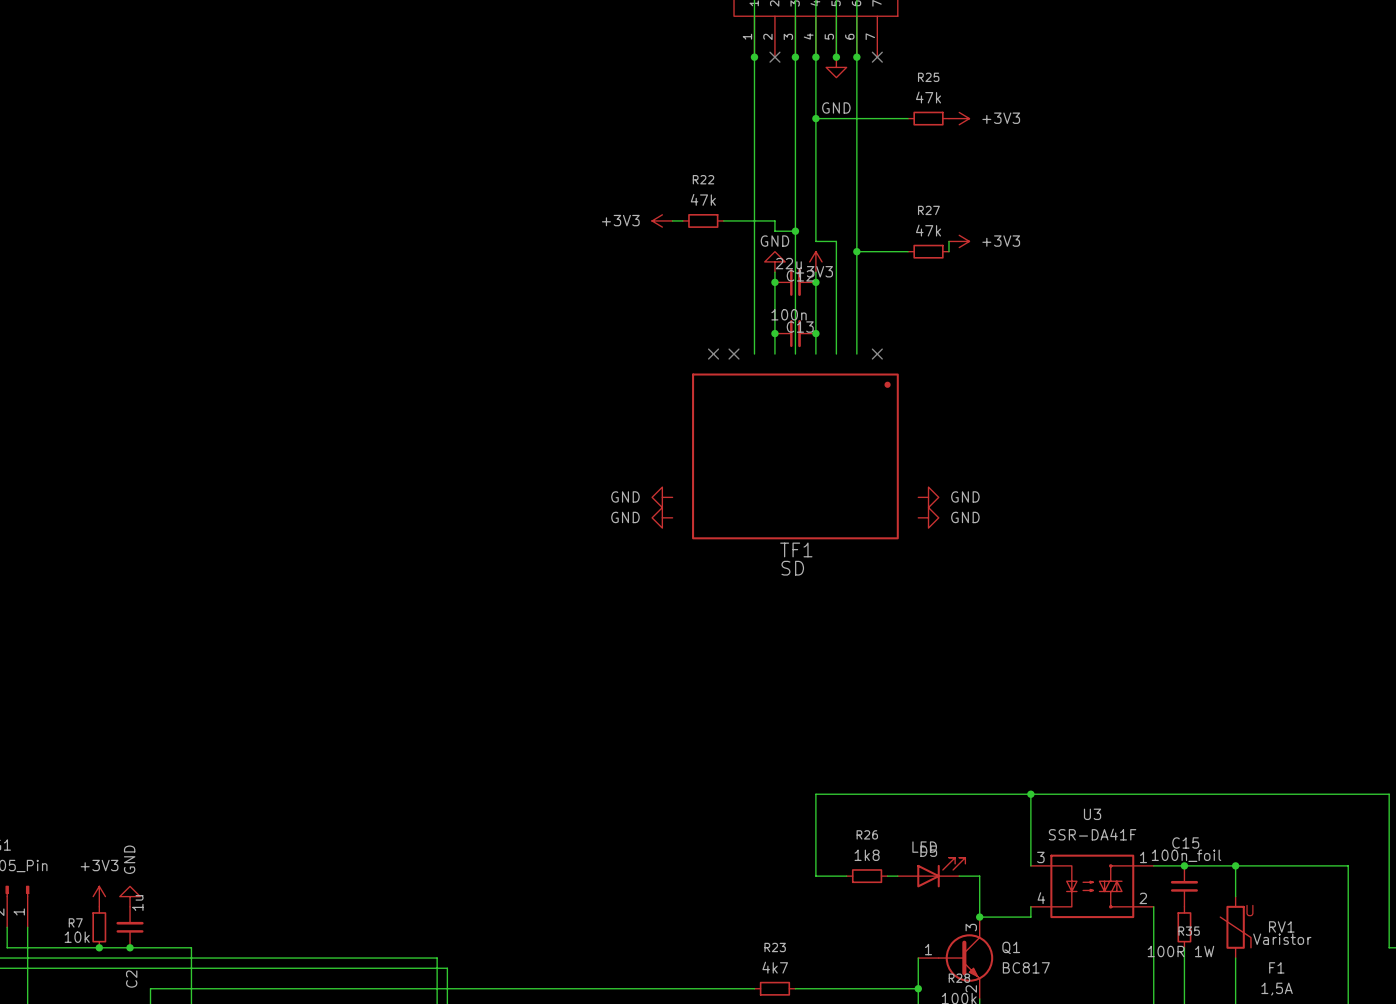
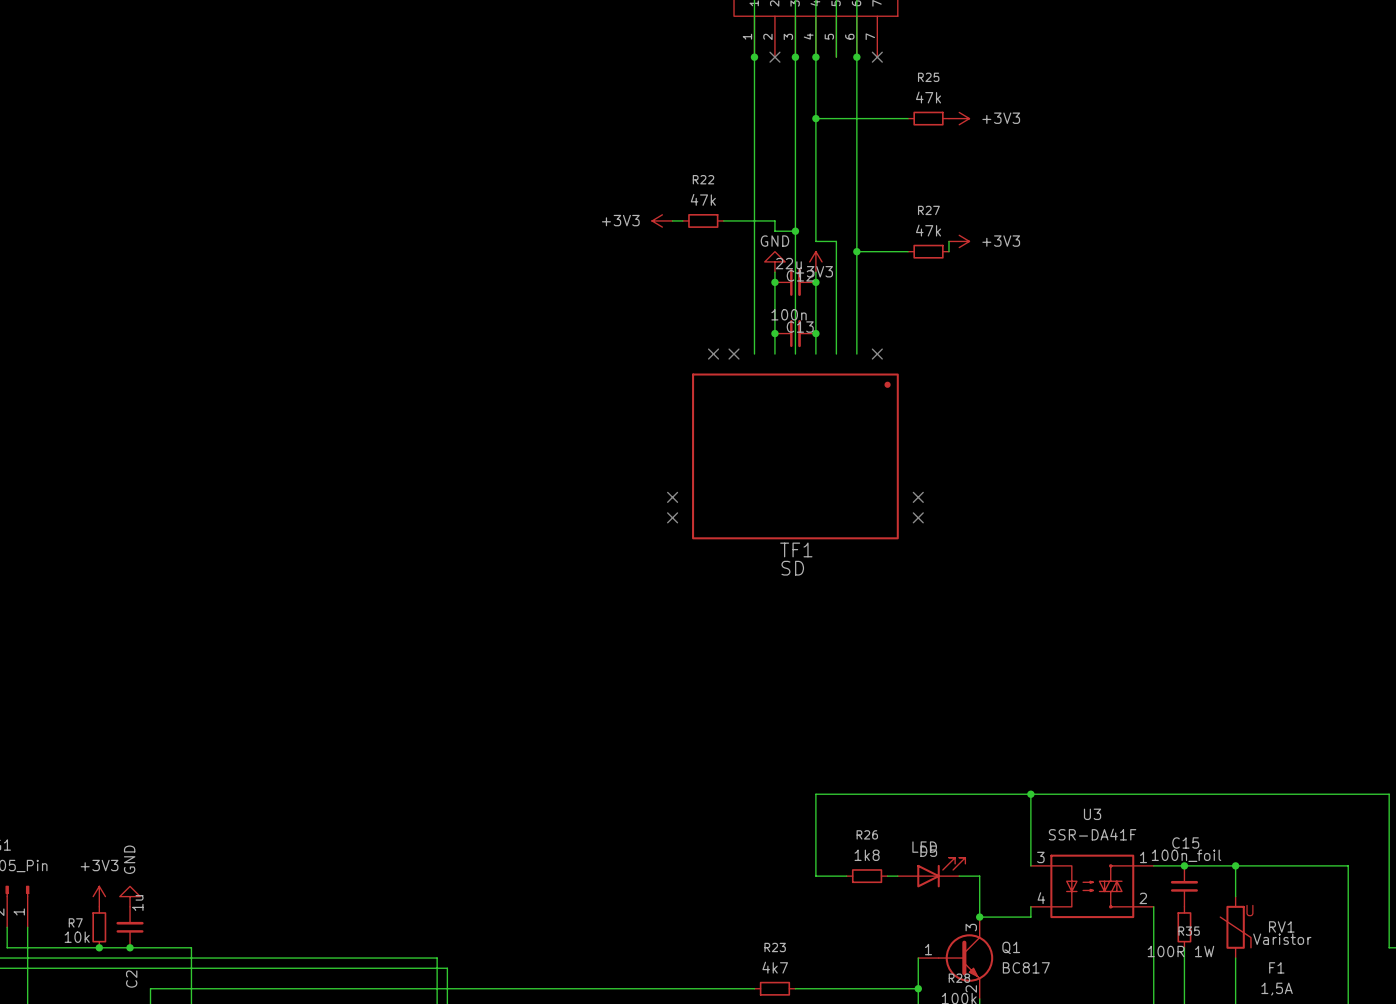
junction: (836, 57) -> none
power symbol: GND (836, 67) -> none
power symbol: GND (662, 497) -> none
no-connect mark: none -> (672, 497)
no-connect mark: none -> (918, 497)
power symbol: GND (928, 497) -> none
power symbol: GND (662, 517) -> none
no-connect mark: none -> (672, 517)
no-connect mark: none -> (918, 517)
power symbol: GND (928, 517) -> none

